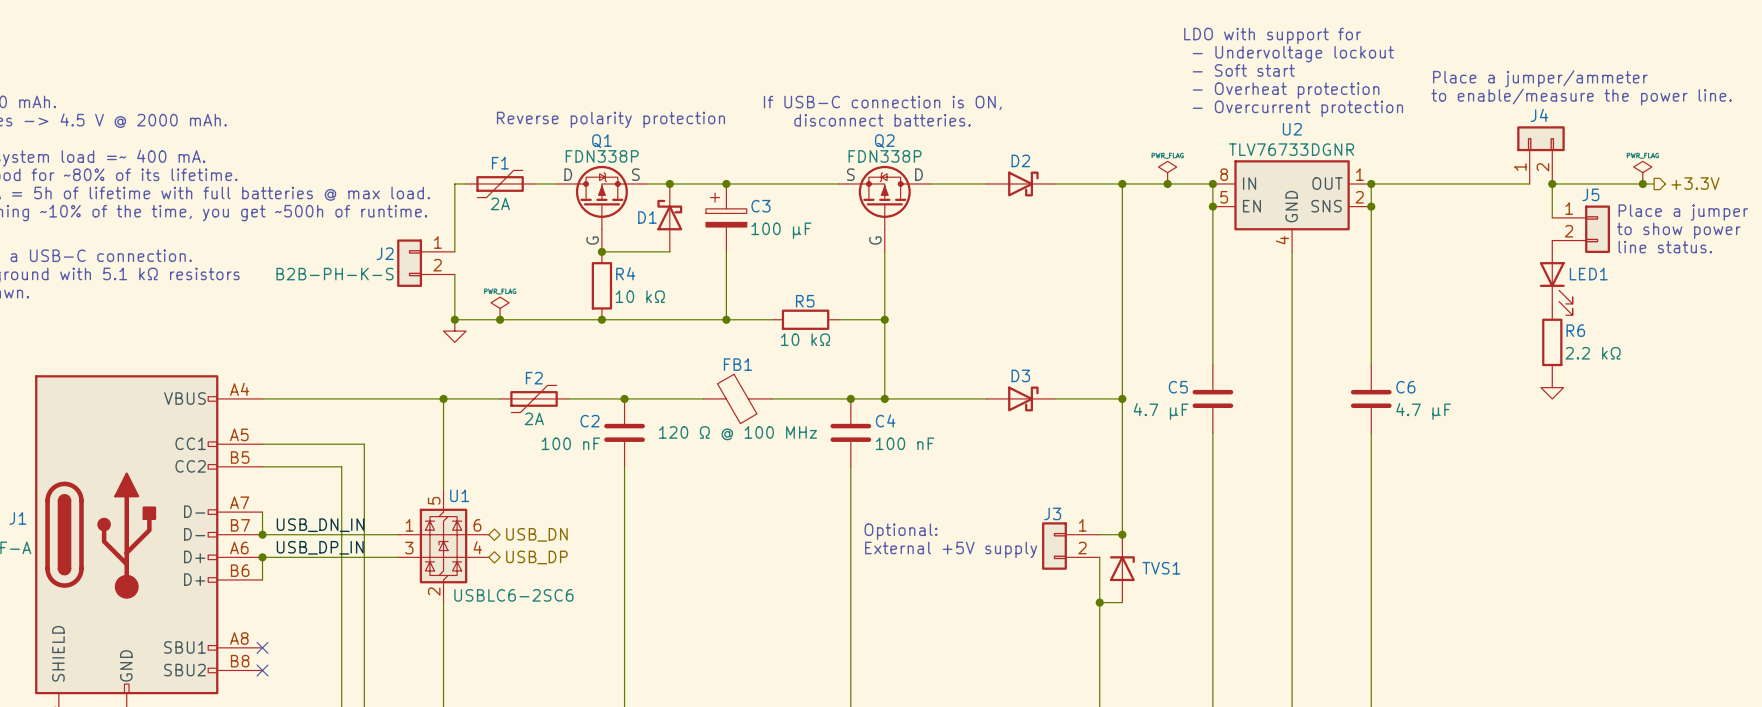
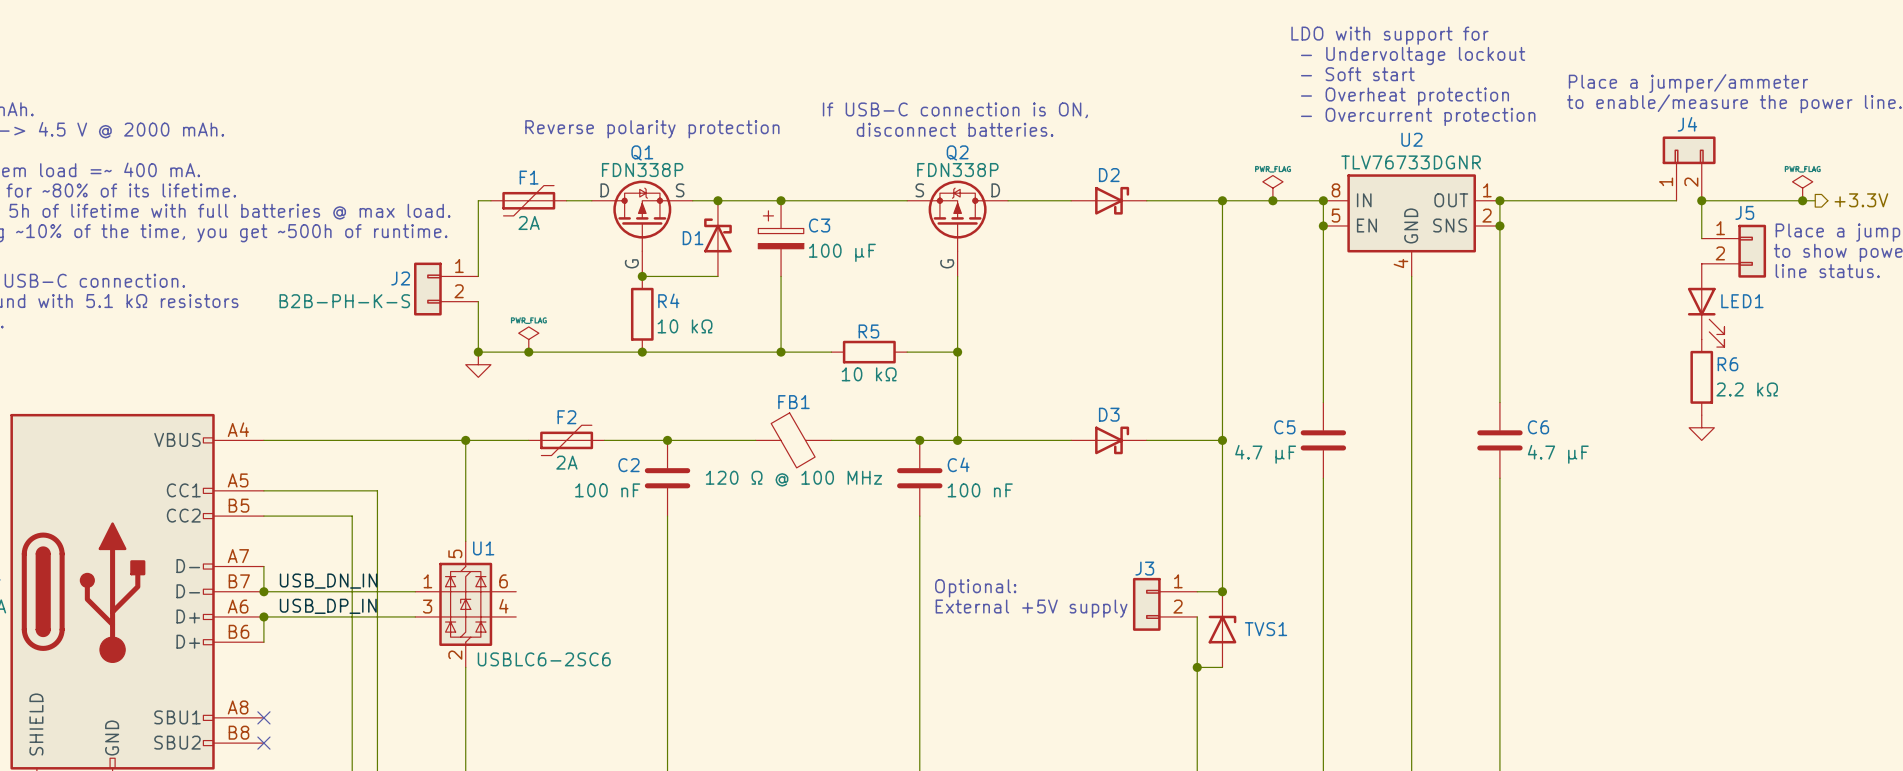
hierarchical label: USB_DN (536, 534) -> none
hierarchical label: USB_DP (536, 557) -> none

